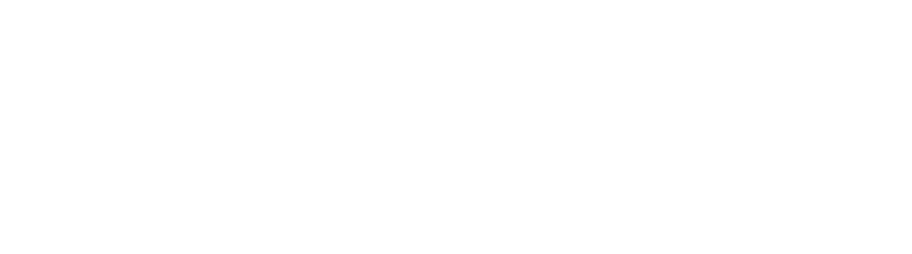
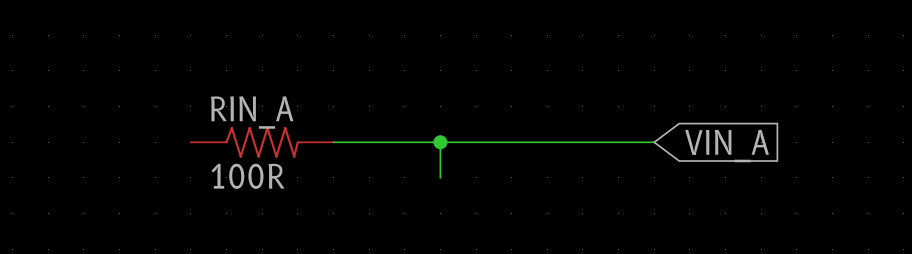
RIN_A: none -> 100R (262, 142)
wire: none -> (333, 142) (654, 142)
wire: none -> (440, 142) (440, 177)
junction: none -> (440, 142)
global label: none -> VIN_A (727, 146)

